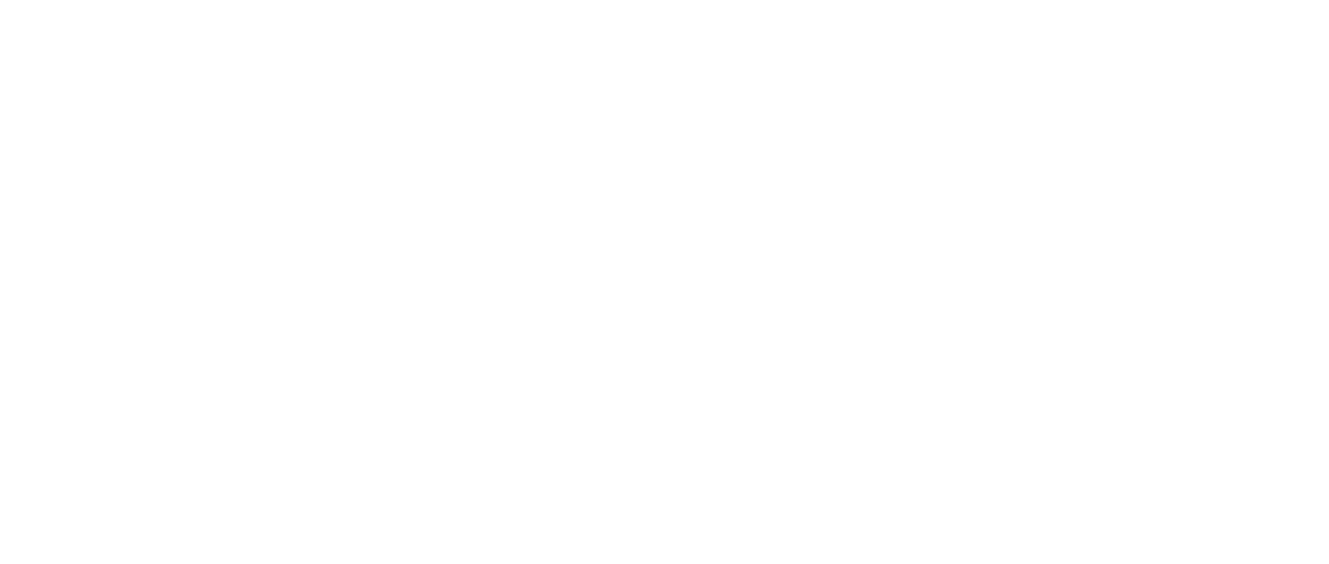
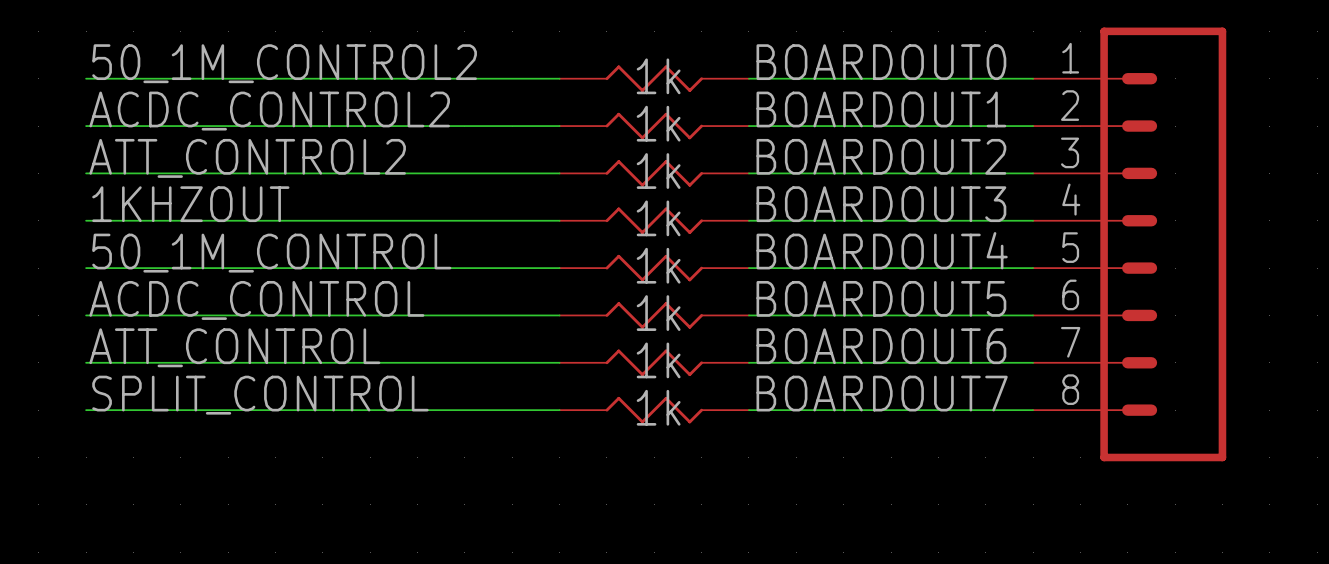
label: none -> BOARDOUT0 (881, 62)
label: none -> 50_1M_CONTROL2 (284, 63)
wire: none -> (86, 78) (559, 78)
part: none -> 1k (654, 78)
wire: none -> (748, 78) (1033, 78)
label: none -> BOARDOUT1 (881, 109)
label: none -> ACDC_CONTROL2 (269, 111)
wire: none -> (86, 126) (559, 126)
part: none -> 1k (654, 126)
wire: none -> (748, 126) (1033, 126)
label: none -> BOARDOUT2 (881, 156)
label: none -> ATT_CONTROL2 (247, 158)
wire: none -> (86, 173) (559, 173)
part: none -> 1k (654, 173)
wire: none -> (748, 173) (1033, 173)
label: none -> 1KHZOUT (190, 204)
label: none -> BOARDOUT3 (881, 204)
wire: none -> (86, 220) (559, 220)
part: none -> 1k (654, 220)
wire: none -> (748, 220) (1033, 220)
part: none -> (1129, 244)
label: none -> BOARDOUT4 (882, 250)
label: none -> 50_1M_CONTROL (271, 253)
wire: none -> (86, 268) (559, 268)
part: none -> 1k (654, 268)
wire: none -> (748, 268) (1033, 268)
label: none -> BOARDOUT5 (881, 298)
label: none -> ACDC_CONTROL (256, 300)
wire: none -> (86, 315) (559, 315)
part: none -> 1k (654, 315)
wire: none -> (748, 315) (1033, 315)
label: none -> BOARDOUT6 (881, 346)
label: none -> ATT_CONTROL (234, 347)
wire: none -> (86, 362) (559, 362)
part: none -> 1k (654, 362)
wire: none -> (748, 362) (1033, 362)
label: none -> BOARDOUT7 (882, 393)
label: none -> SPLIT_CONTROL (260, 395)
wire: none -> (86, 410) (559, 410)
part: none -> 1k (654, 410)
wire: none -> (748, 410) (1033, 410)

